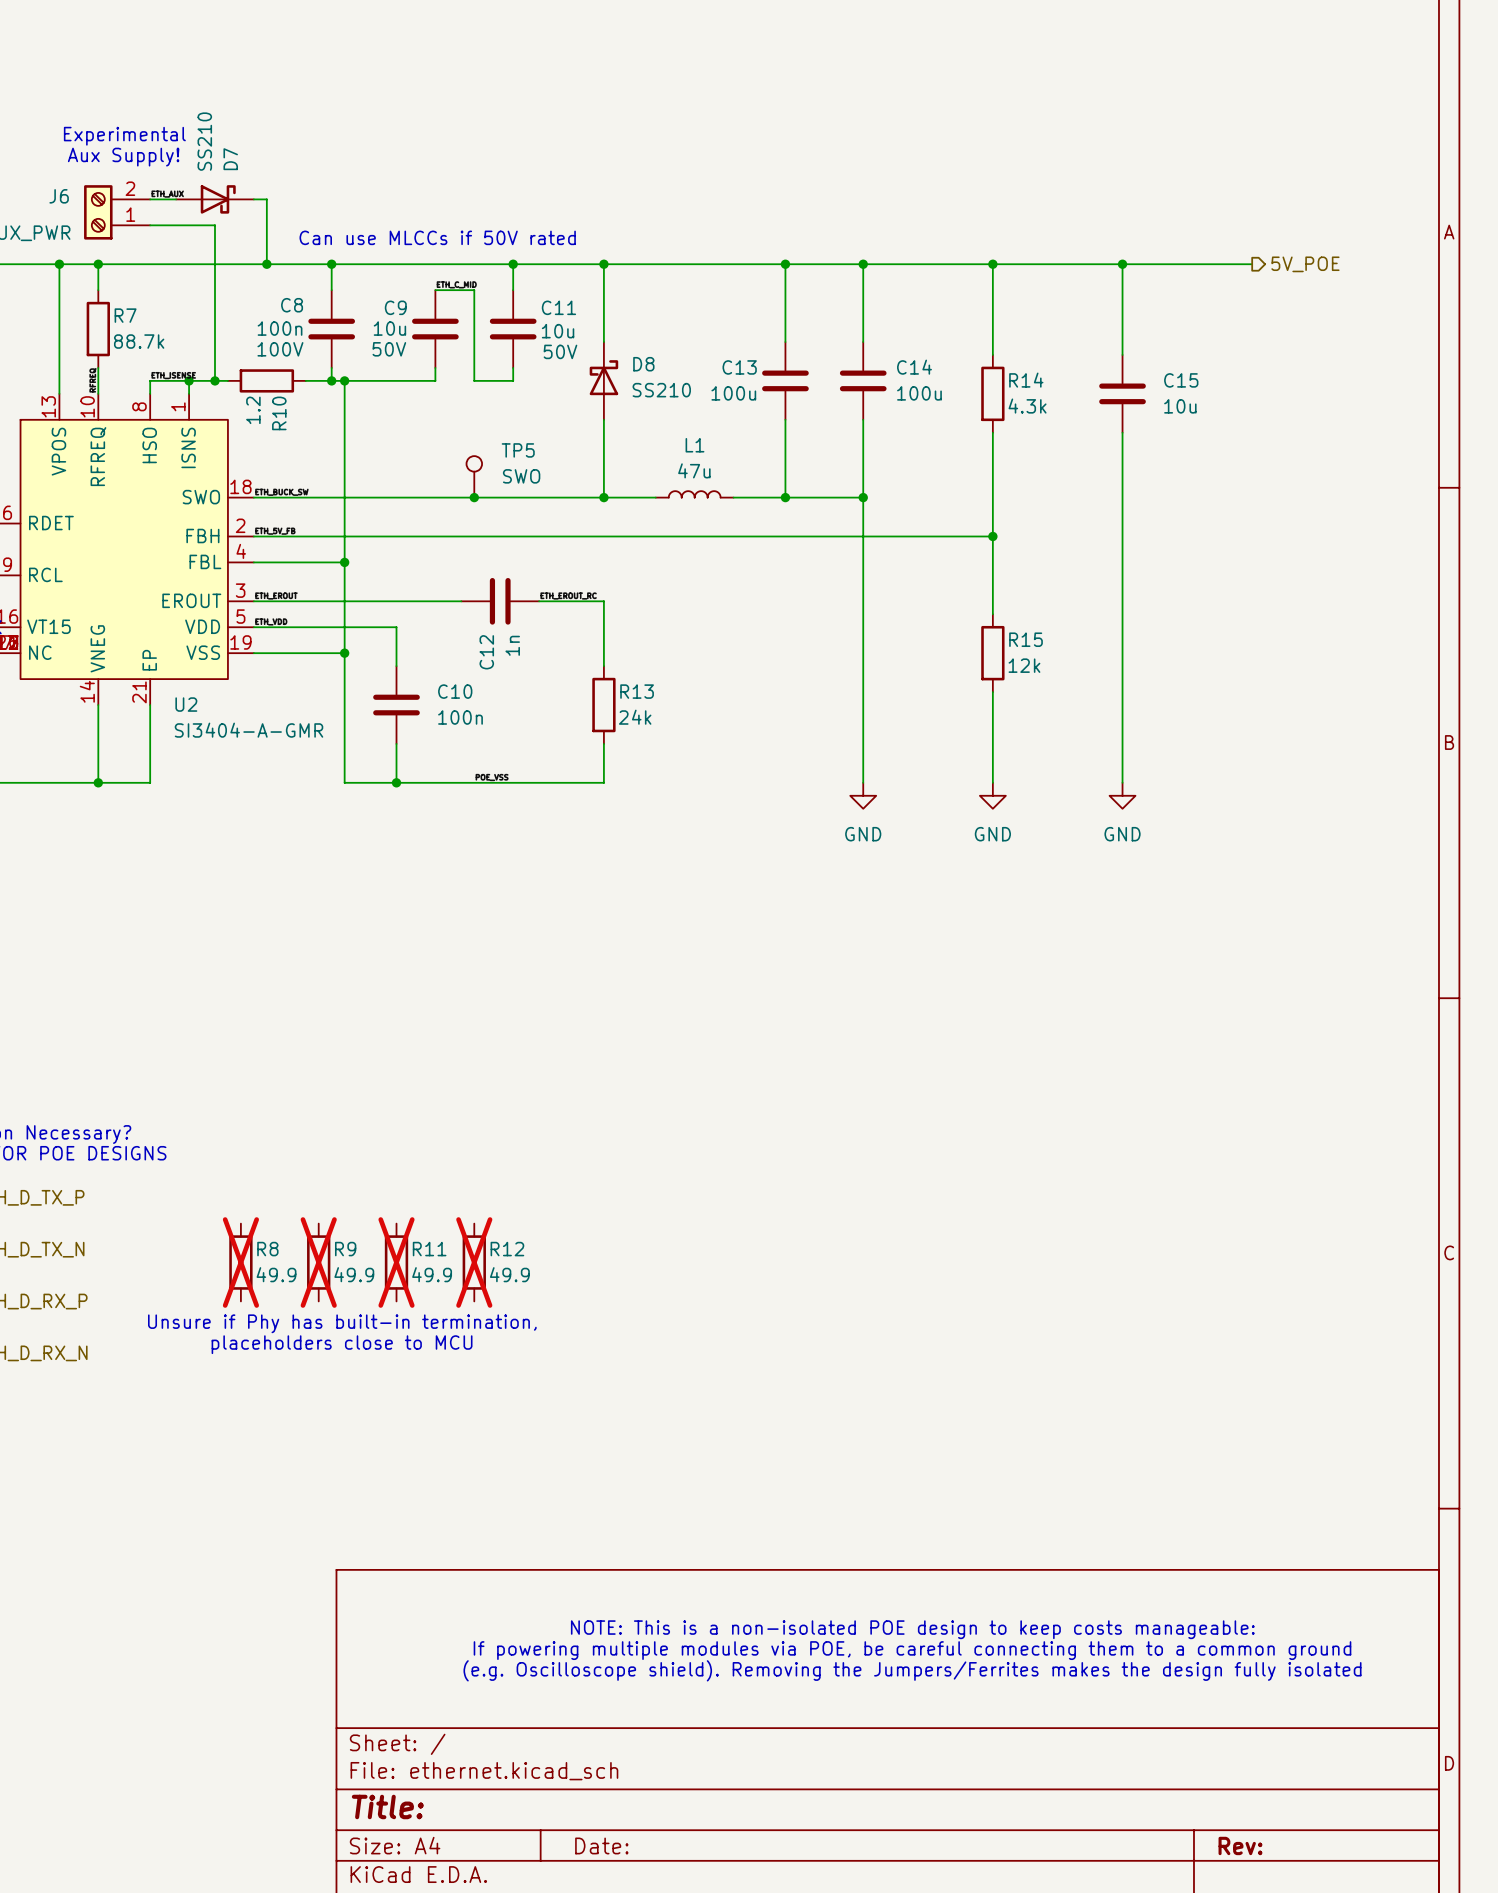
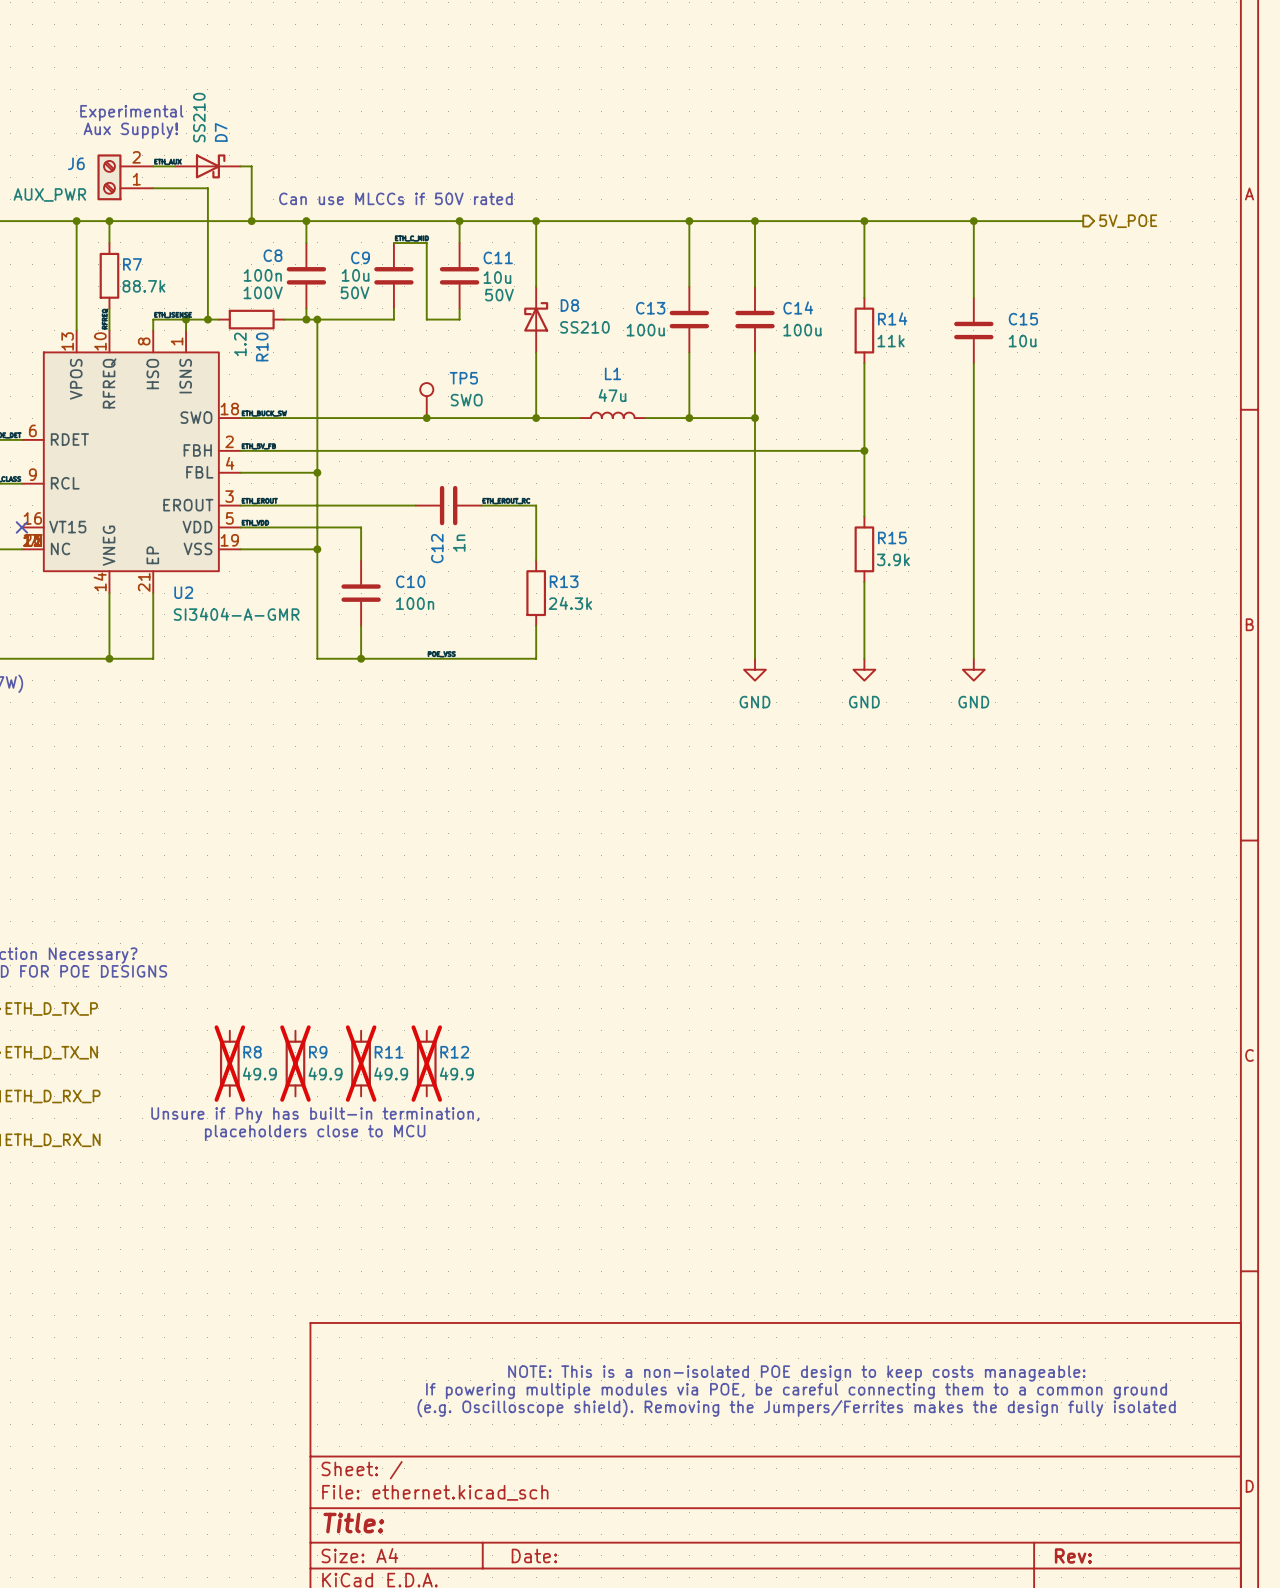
R14 value: 4.3k (1027, 406) -> 11k (891, 341)
R15 value: 12k (1024, 665) -> 3.9k (893, 559)
R13 value: 24k (635, 717) -> 24.3k (570, 603)

